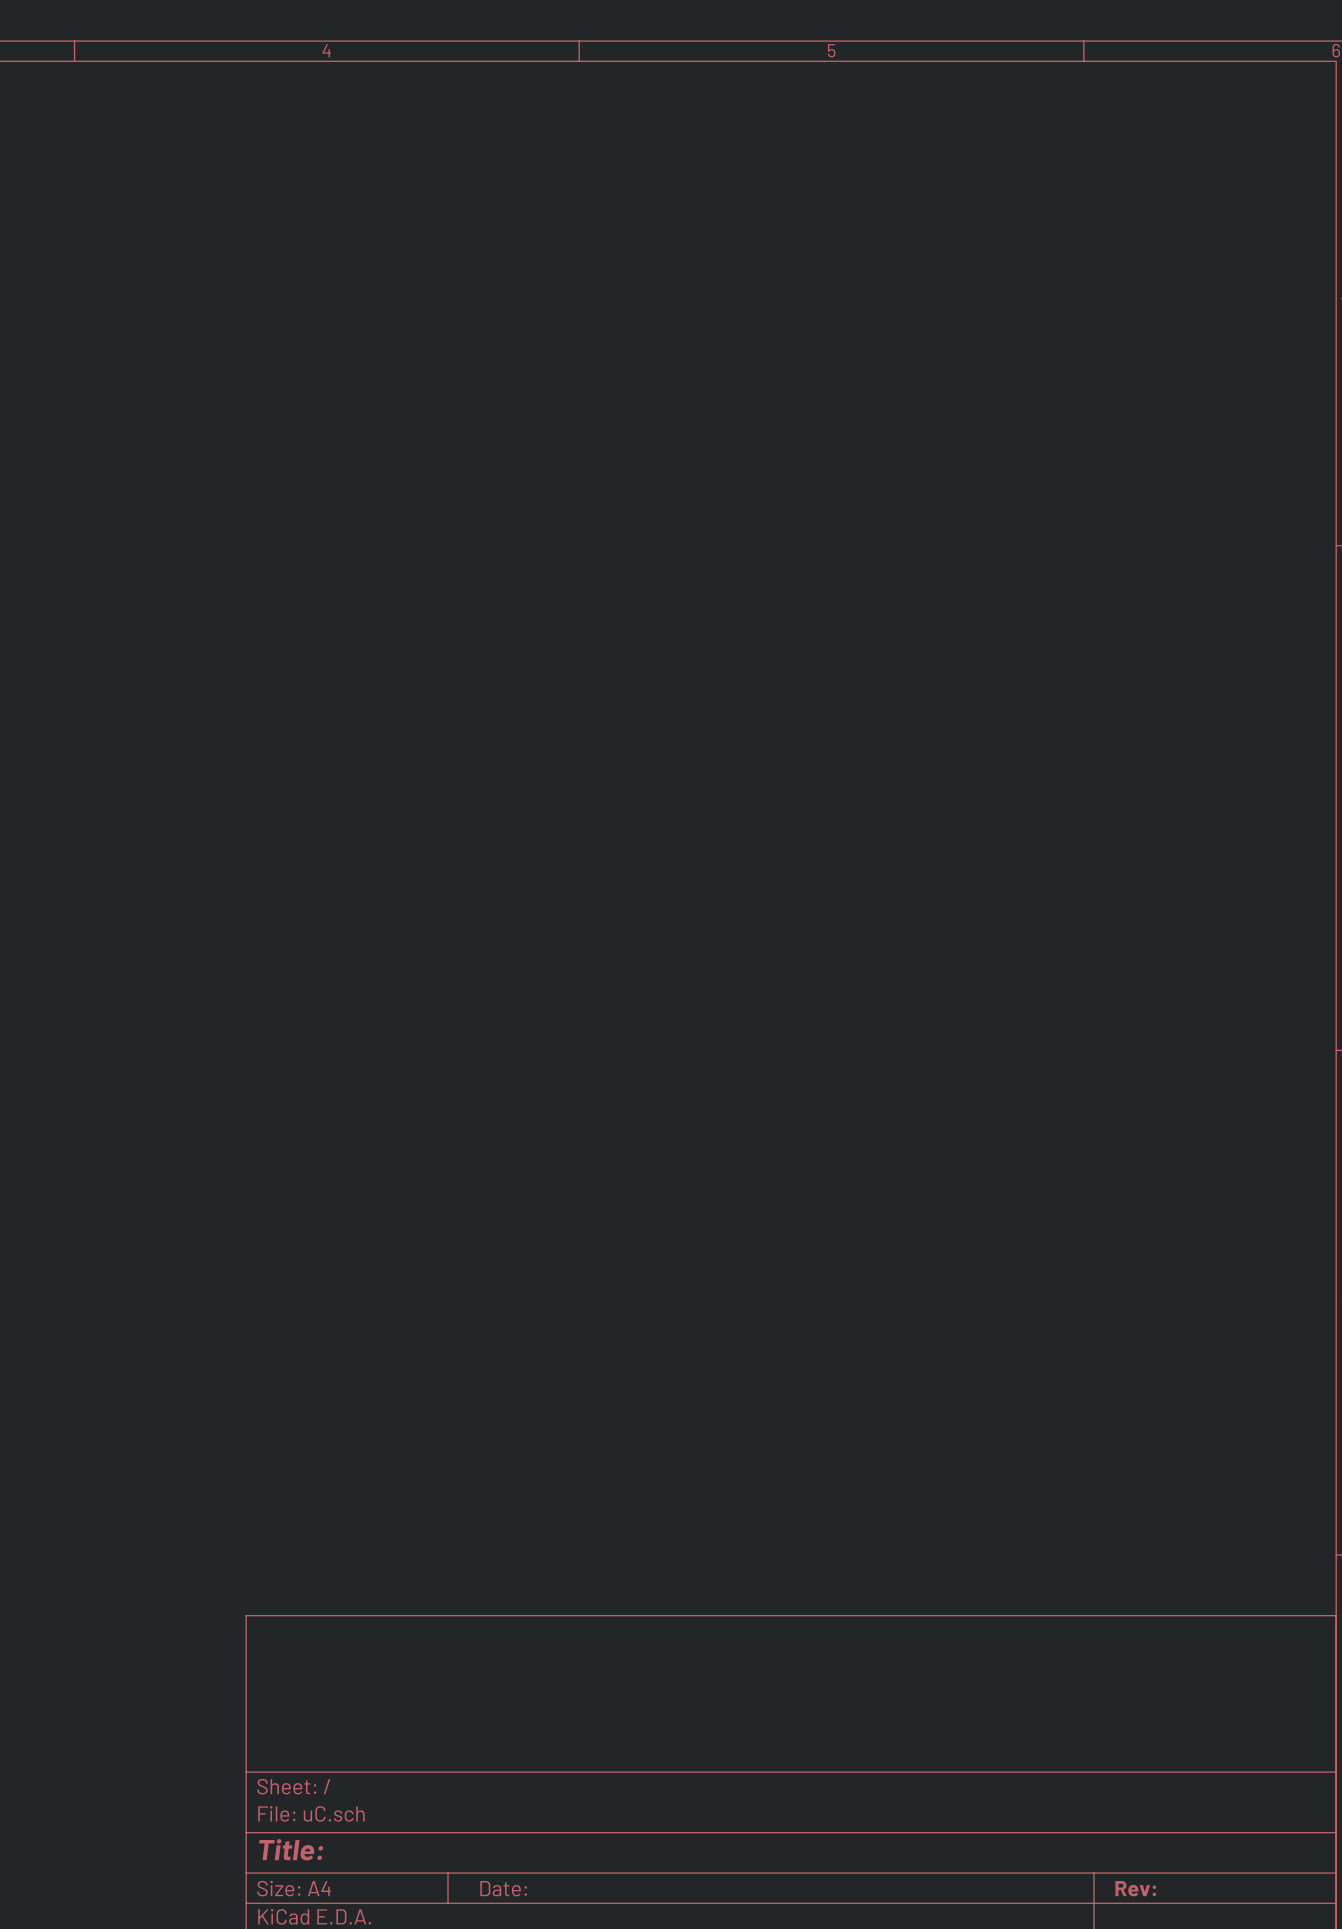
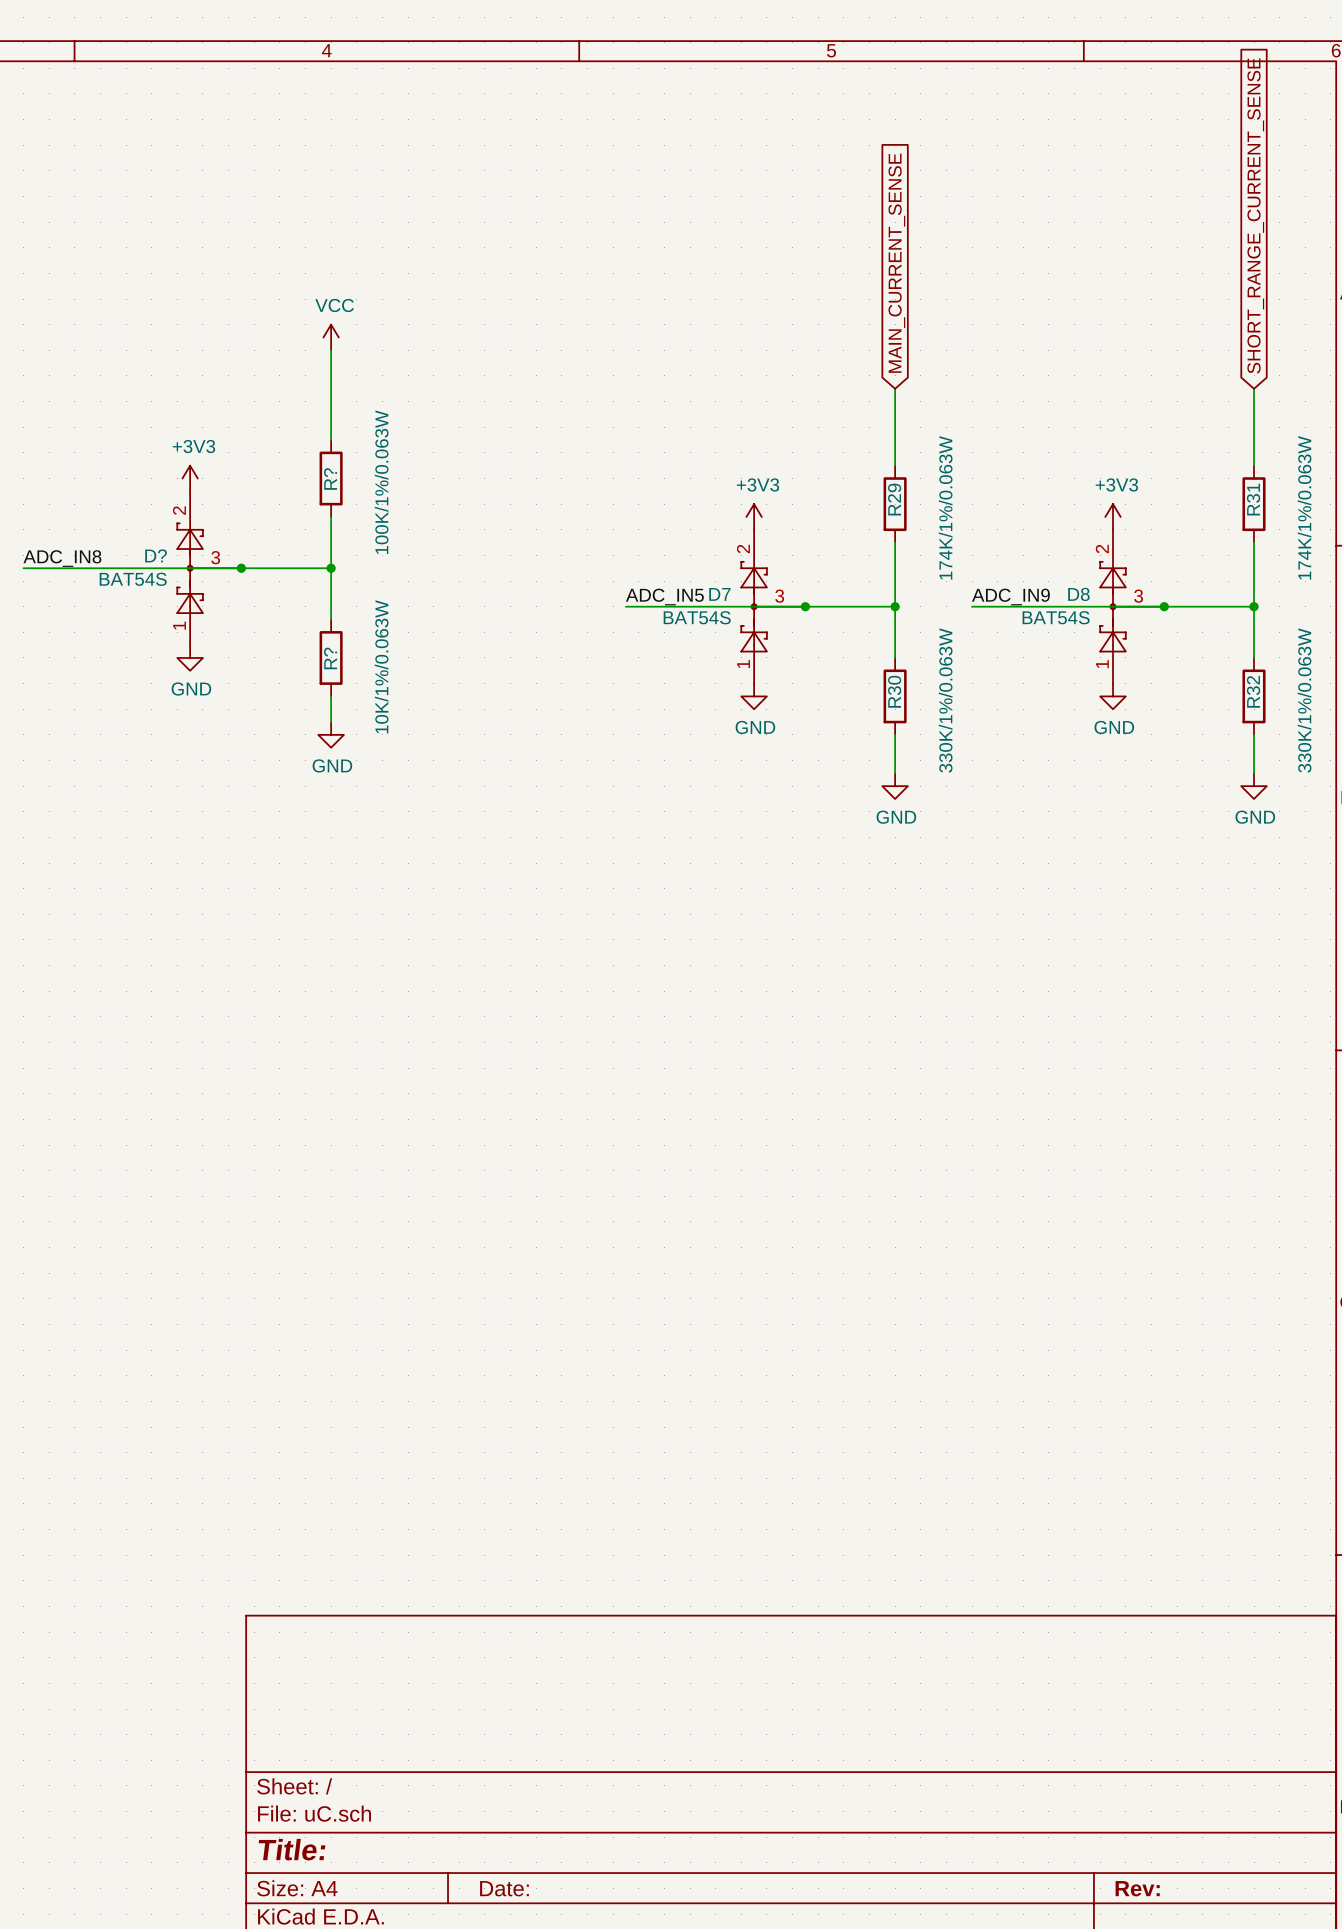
global label: none -> SHORT_RANGE_CURRENT_SENSE (1255, 215)
global label: none -> MAIN_CURRENT_SENSE (896, 263)
power symbol: none -> VCC (331, 337)
wire: none -> (331, 350) (331, 440)
wire: none -> (895, 388) (895, 465)
wire: none -> (1254, 388) (1254, 465)
power symbol: none -> +3V3 (190, 478)
R?: none -> 100K/1%/0.063W (331, 478)
R29: none -> 174K/1%/0.063W (895, 504)
R31: none -> 174K/1%/0.063W (1254, 504)
wire: none -> (331, 516) (331, 619)
power symbol: none -> +3V3 (754, 516)
power symbol: none -> +3V3 (1113, 516)
wire: none -> (895, 542) (895, 657)
wire: none -> (1254, 542) (1254, 657)
label: none -> ADC_IN8 (62, 558)
wire: none -> (23, 568) (331, 568)
D?: none -> BAT54S (209, 568)
junction: none -> (241, 568)
junction: none -> (331, 568)
label: none -> ADC_IN5 (664, 597)
label: none -> ADC_IN9 (1010, 597)
wire: none -> (625, 606) (895, 606)
D7: none -> BAT54S (773, 606)
junction: none -> (805, 606)
junction: none -> (895, 606)
wire: none -> (972, 606) (1254, 606)
D8: none -> BAT54S (1132, 606)
junction: none -> (1164, 606)
junction: none -> (1254, 606)
power symbol: none -> GND (190, 657)
R?: none -> 10K/1%/0.063W (331, 657)
wire: none -> (331, 696) (331, 722)
power symbol: none -> GND (754, 696)
R30: none -> 330K/1%/0.063W (895, 696)
power symbol: none -> GND (1113, 696)
R32: none -> 330K/1%/0.063W (1254, 696)
power symbol: none -> GND (331, 734)
wire: none -> (895, 734) (895, 773)
wire: none -> (1254, 734) (1254, 773)
power symbol: none -> GND (895, 786)
power symbol: none -> GND (1254, 786)

